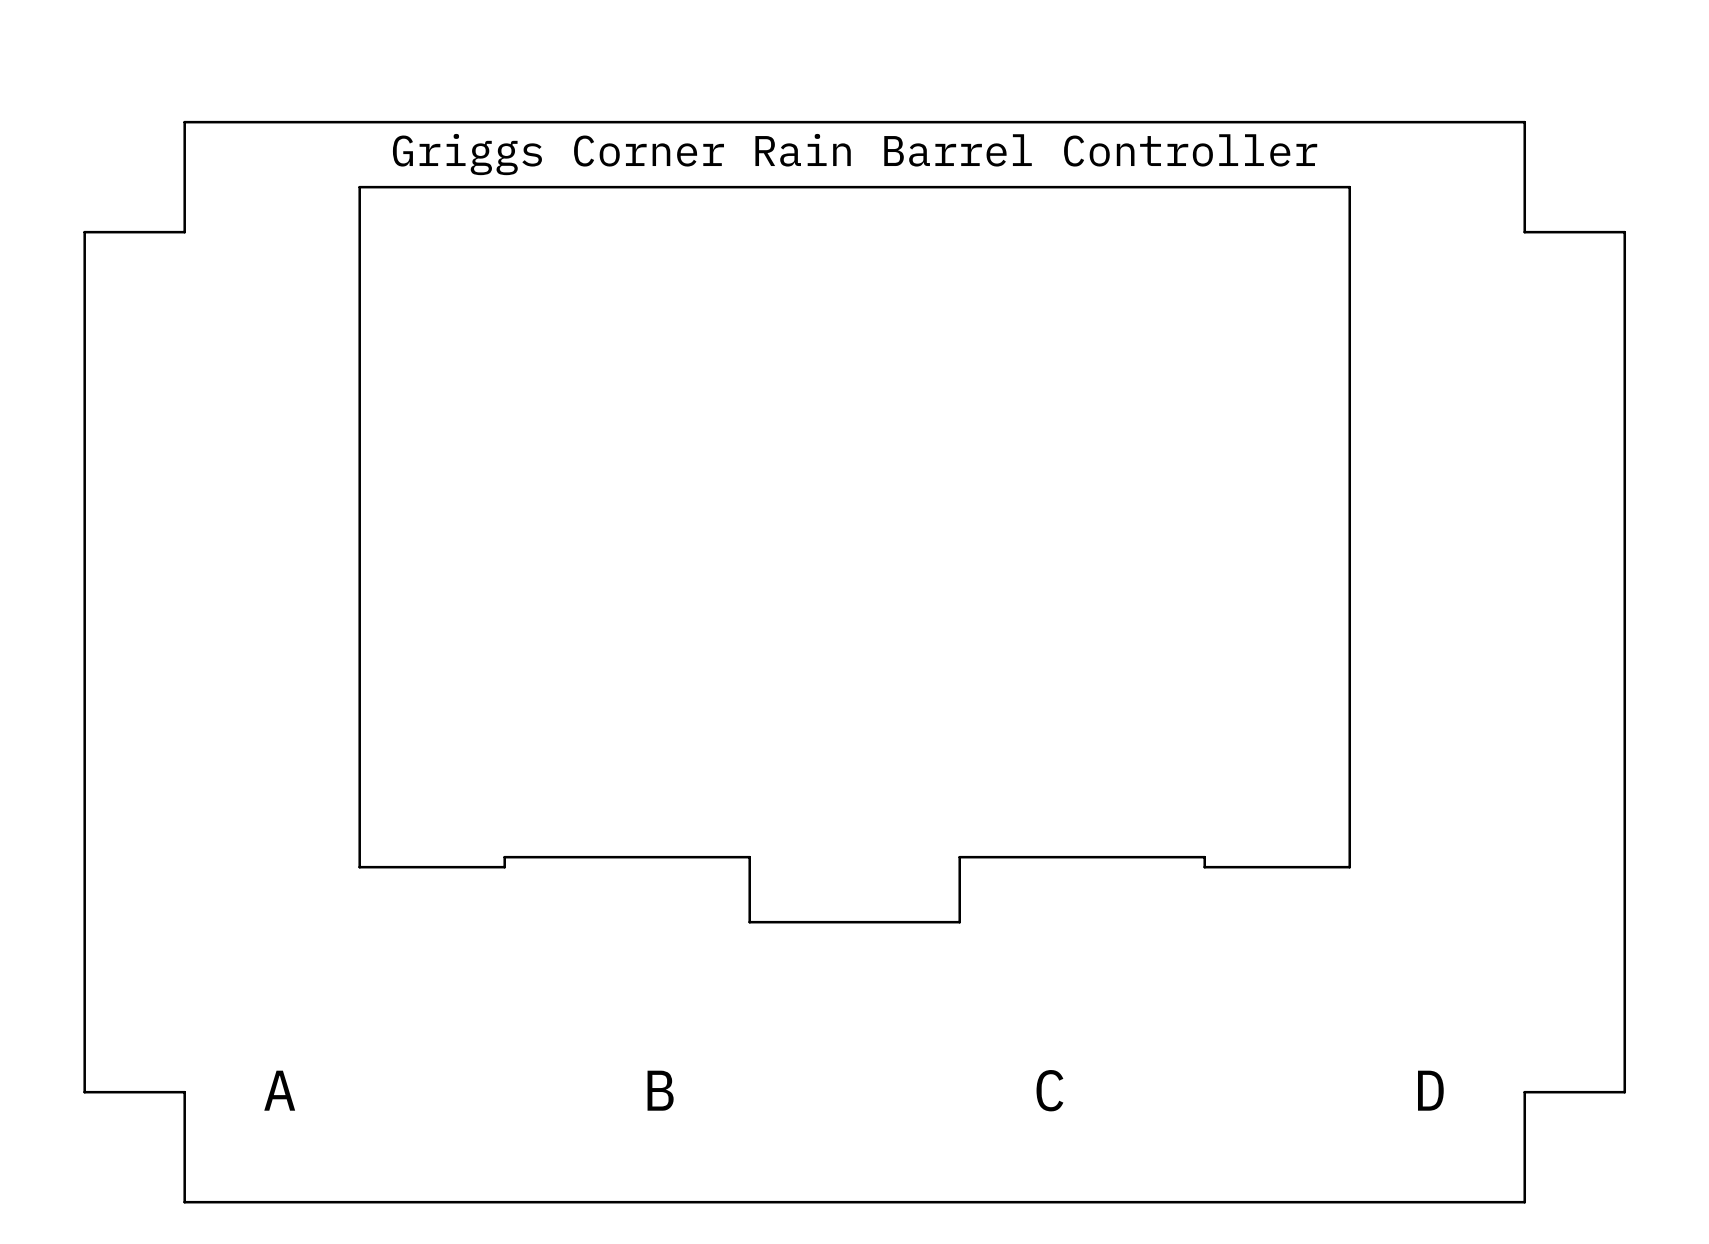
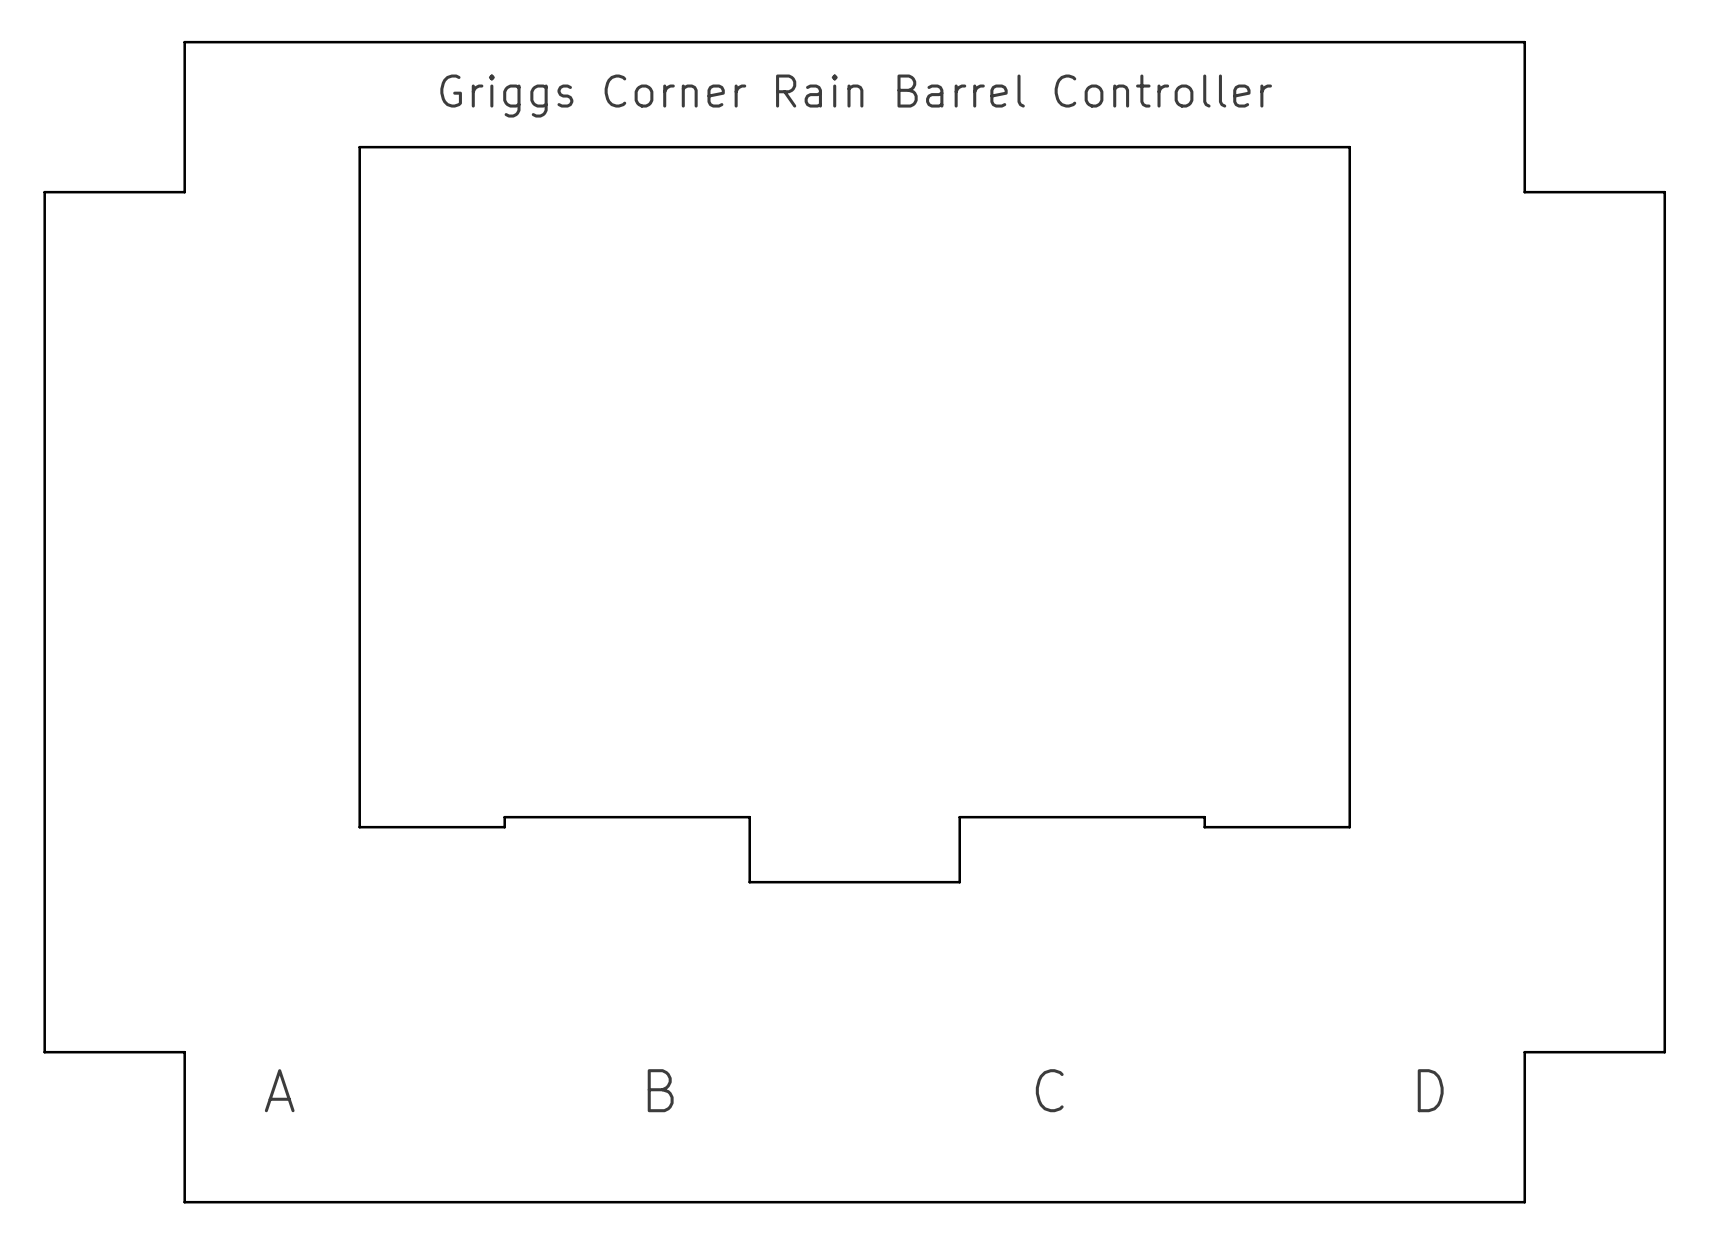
board edge: (184, 122) (1524, 122) -> (184, 122) (184, 42) (1524, 42) (1524, 122)
text position: Griggs Corner Rain Barrel Controller (855, 154) -> Griggs Corner Rain Barrel Controller (856, 96)
board edge: (359, 187) (1349, 187) -> (359, 187) (359, 147) (1349, 147) (1349, 187)
board edge: (184, 192) (184, 232) (84, 232) (84, 1092) (184, 1092) -> (184, 192) (44, 192) (44, 1052) (184, 1052) (184, 1092)
board edge: (1524, 192) (1524, 232) (1624, 232) (1624, 1092) (1524, 1092) -> (1524, 192) (1664, 192) (1664, 1052) (1524, 1052) (1524, 1092)
board edge: (359, 827) (359, 867) (504, 867) (504, 857) (749, 857) -> (359, 827) (504, 827) (504, 817) (749, 817) (749, 857)
board edge: (1349, 827) (1349, 867) (1204, 867) (1204, 857) (959, 857) -> (1349, 827) (1204, 827) (1204, 817) (959, 817) (959, 857)
board edge: (749, 882) (749, 922) (959, 922) (959, 882) -> (749, 882) (959, 882)

